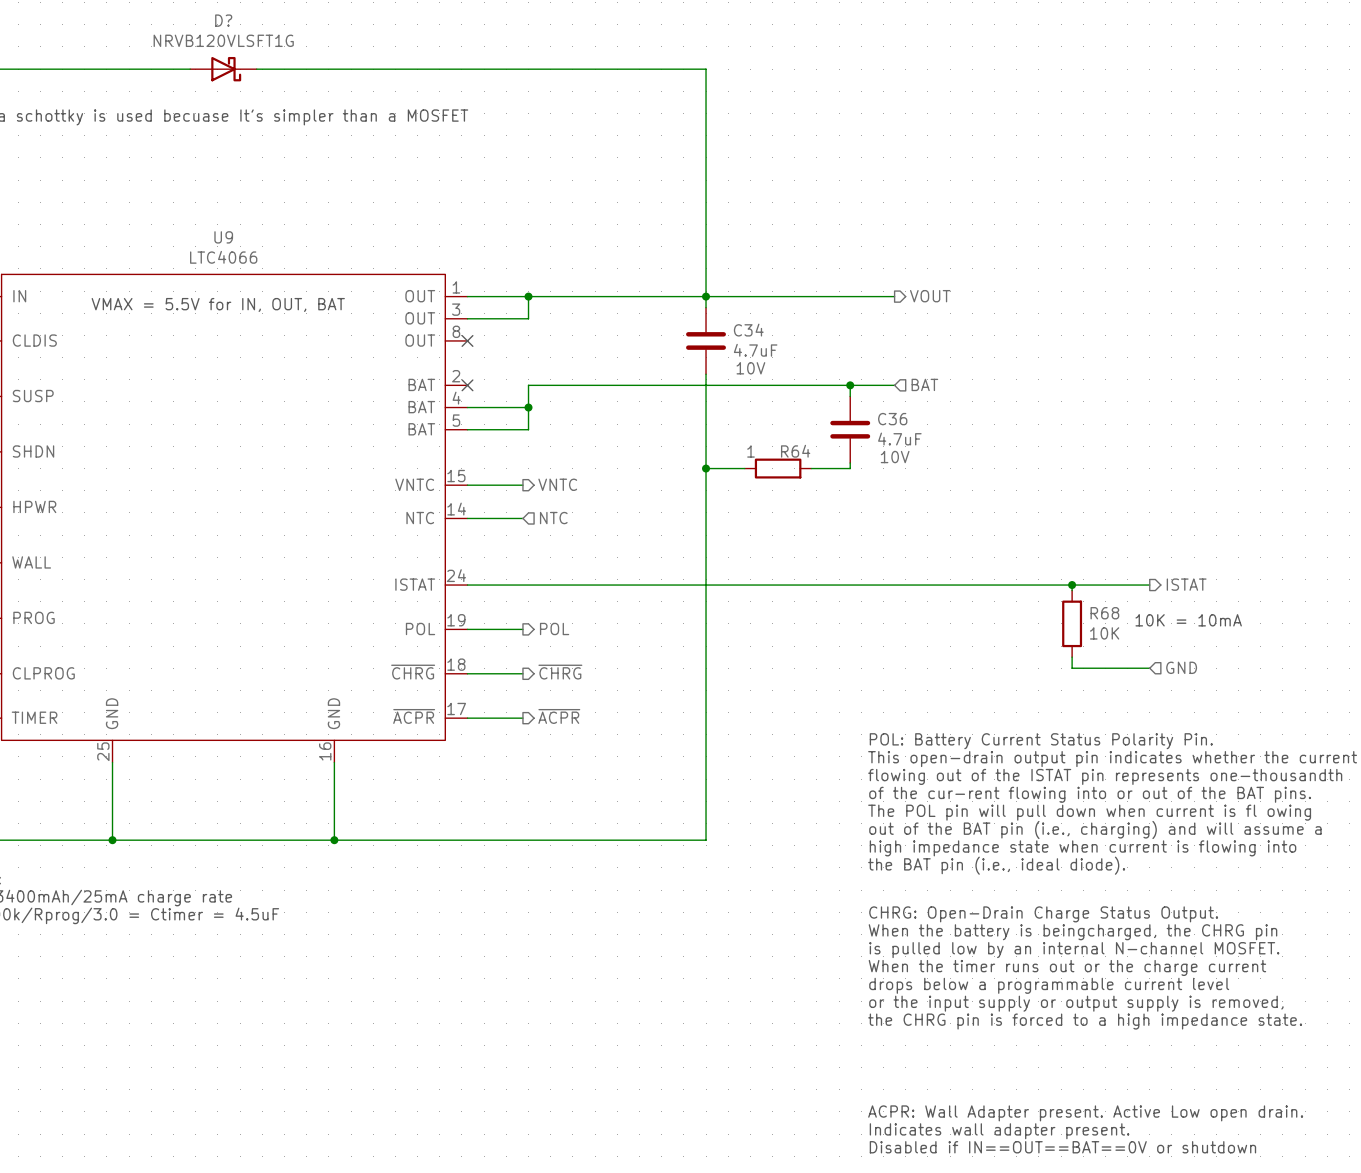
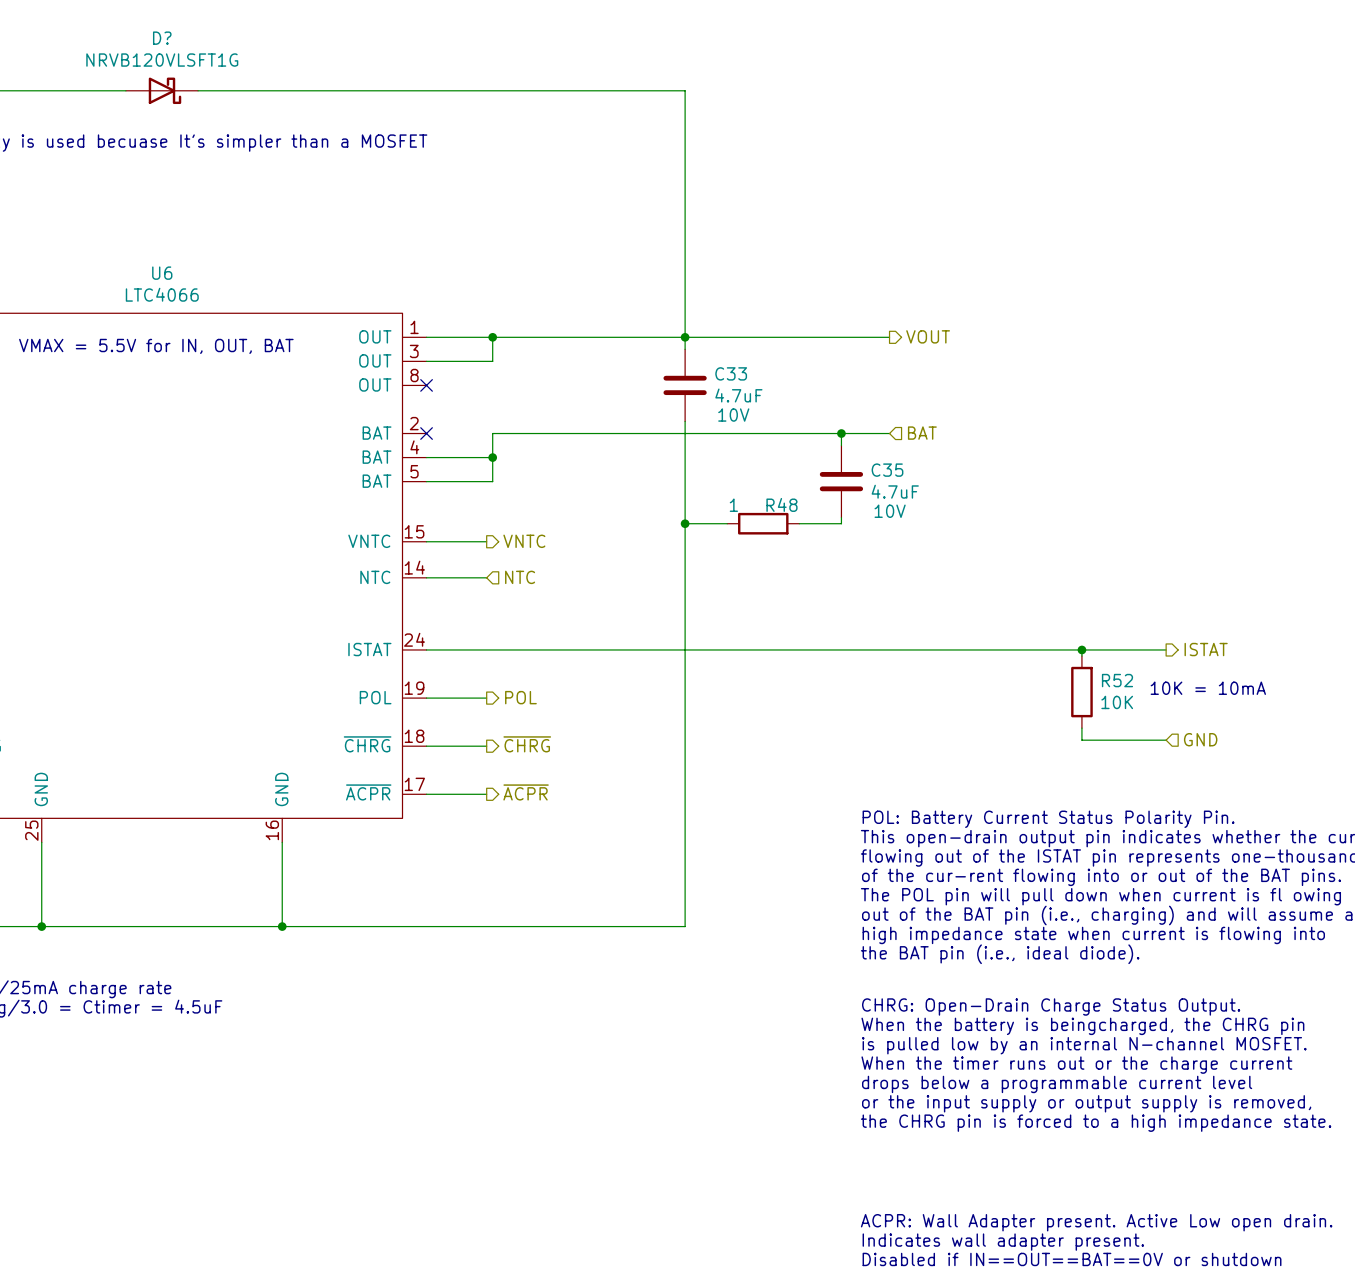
U9 name: U9 (223, 237) -> U6 (162, 273)
C34 name: C34 (748, 330) -> C33 (731, 373)
C36 name: C36 (892, 419) -> C35 (887, 470)
R64 name: R64 (795, 451) -> R48 (781, 504)
R68 name: R68 (1104, 613) -> R52 (1117, 680)

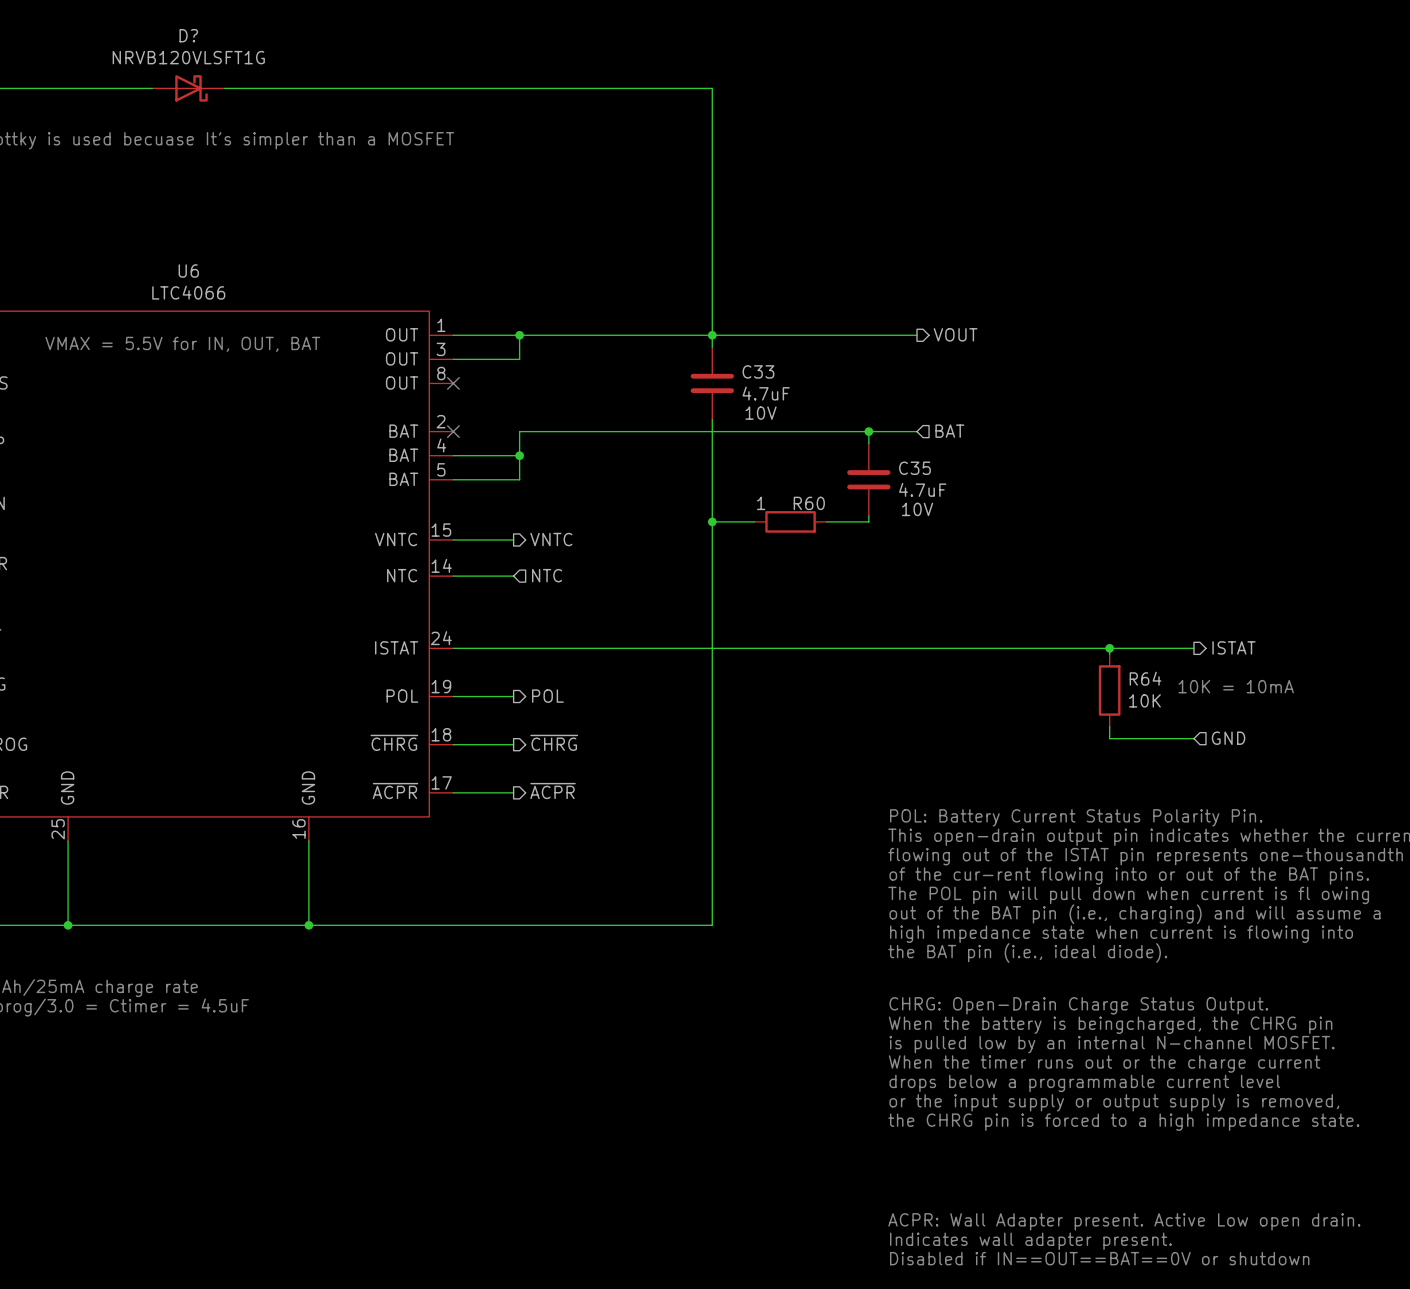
R48 name: R48 (781, 504) -> R60 (809, 503)
R52 name: R52 (1117, 680) -> R64 (1145, 678)

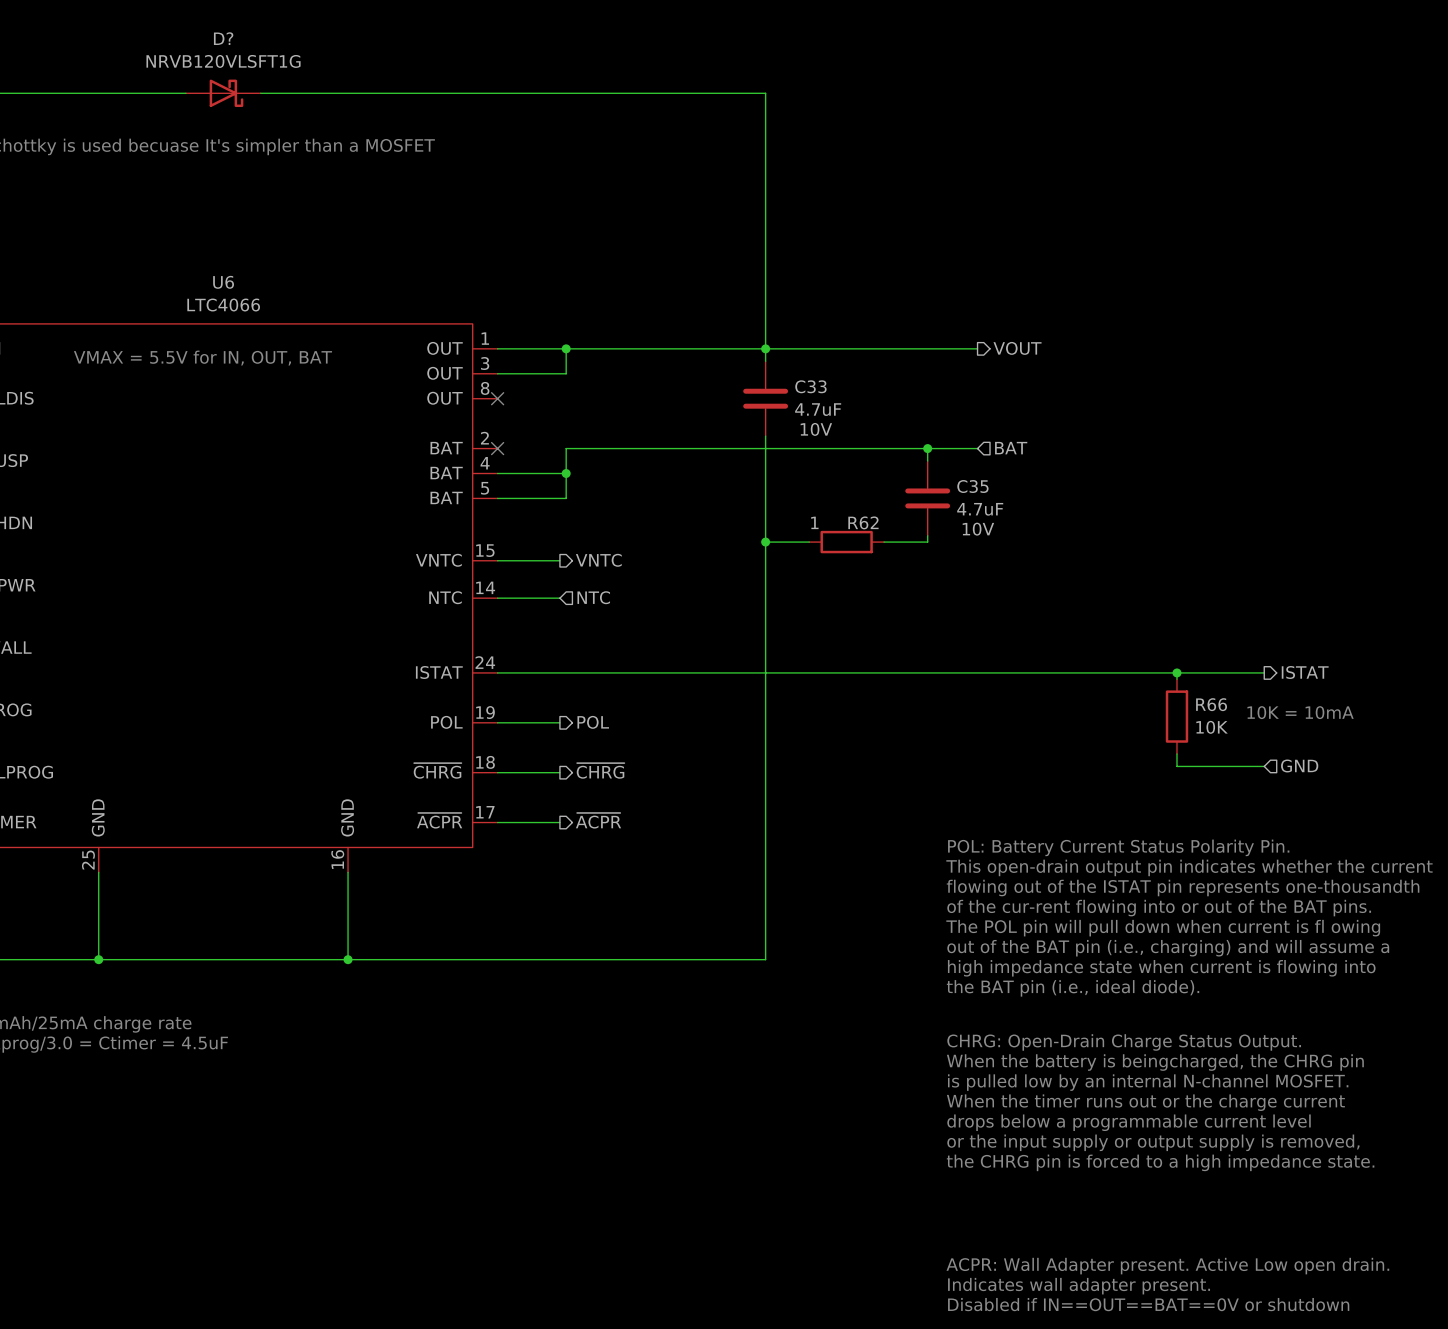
R60 name: R60 (809, 503) -> R62 (863, 522)
R64 name: R64 (1145, 678) -> R66 (1211, 704)

